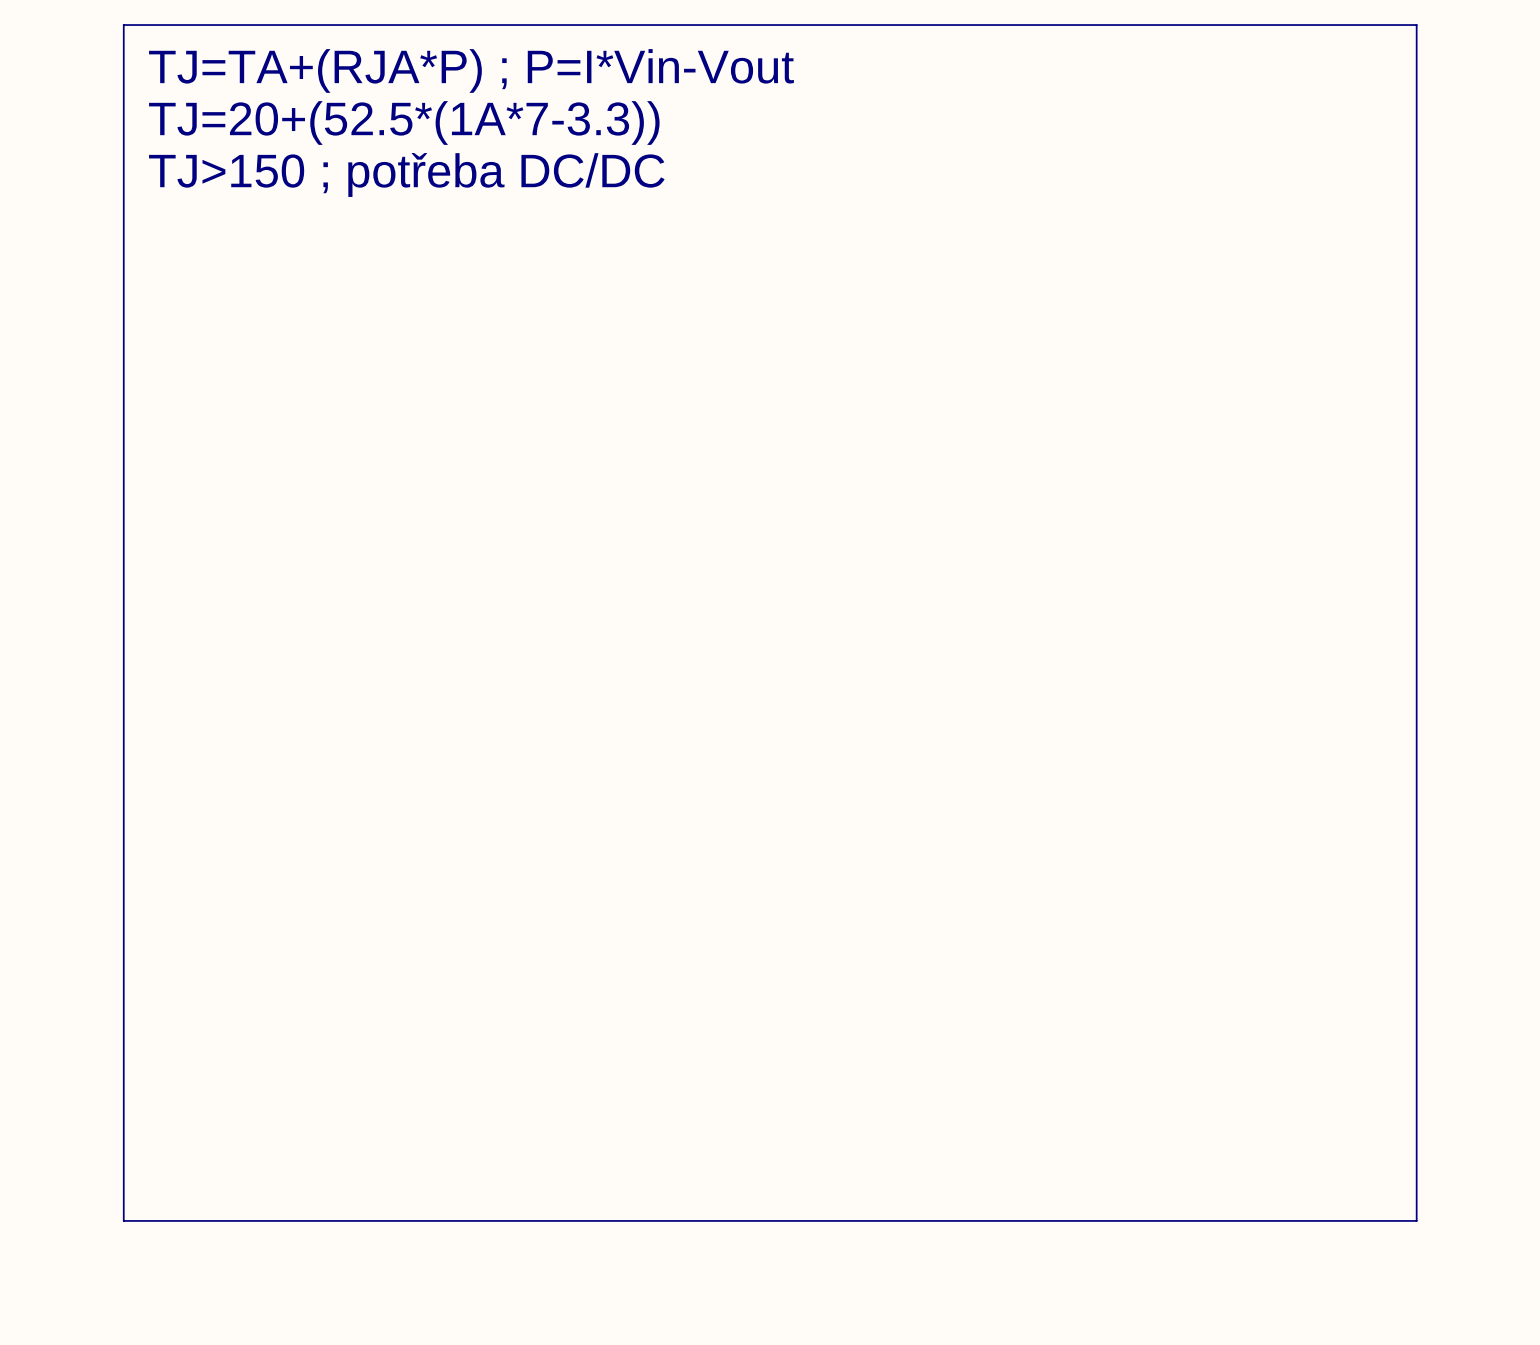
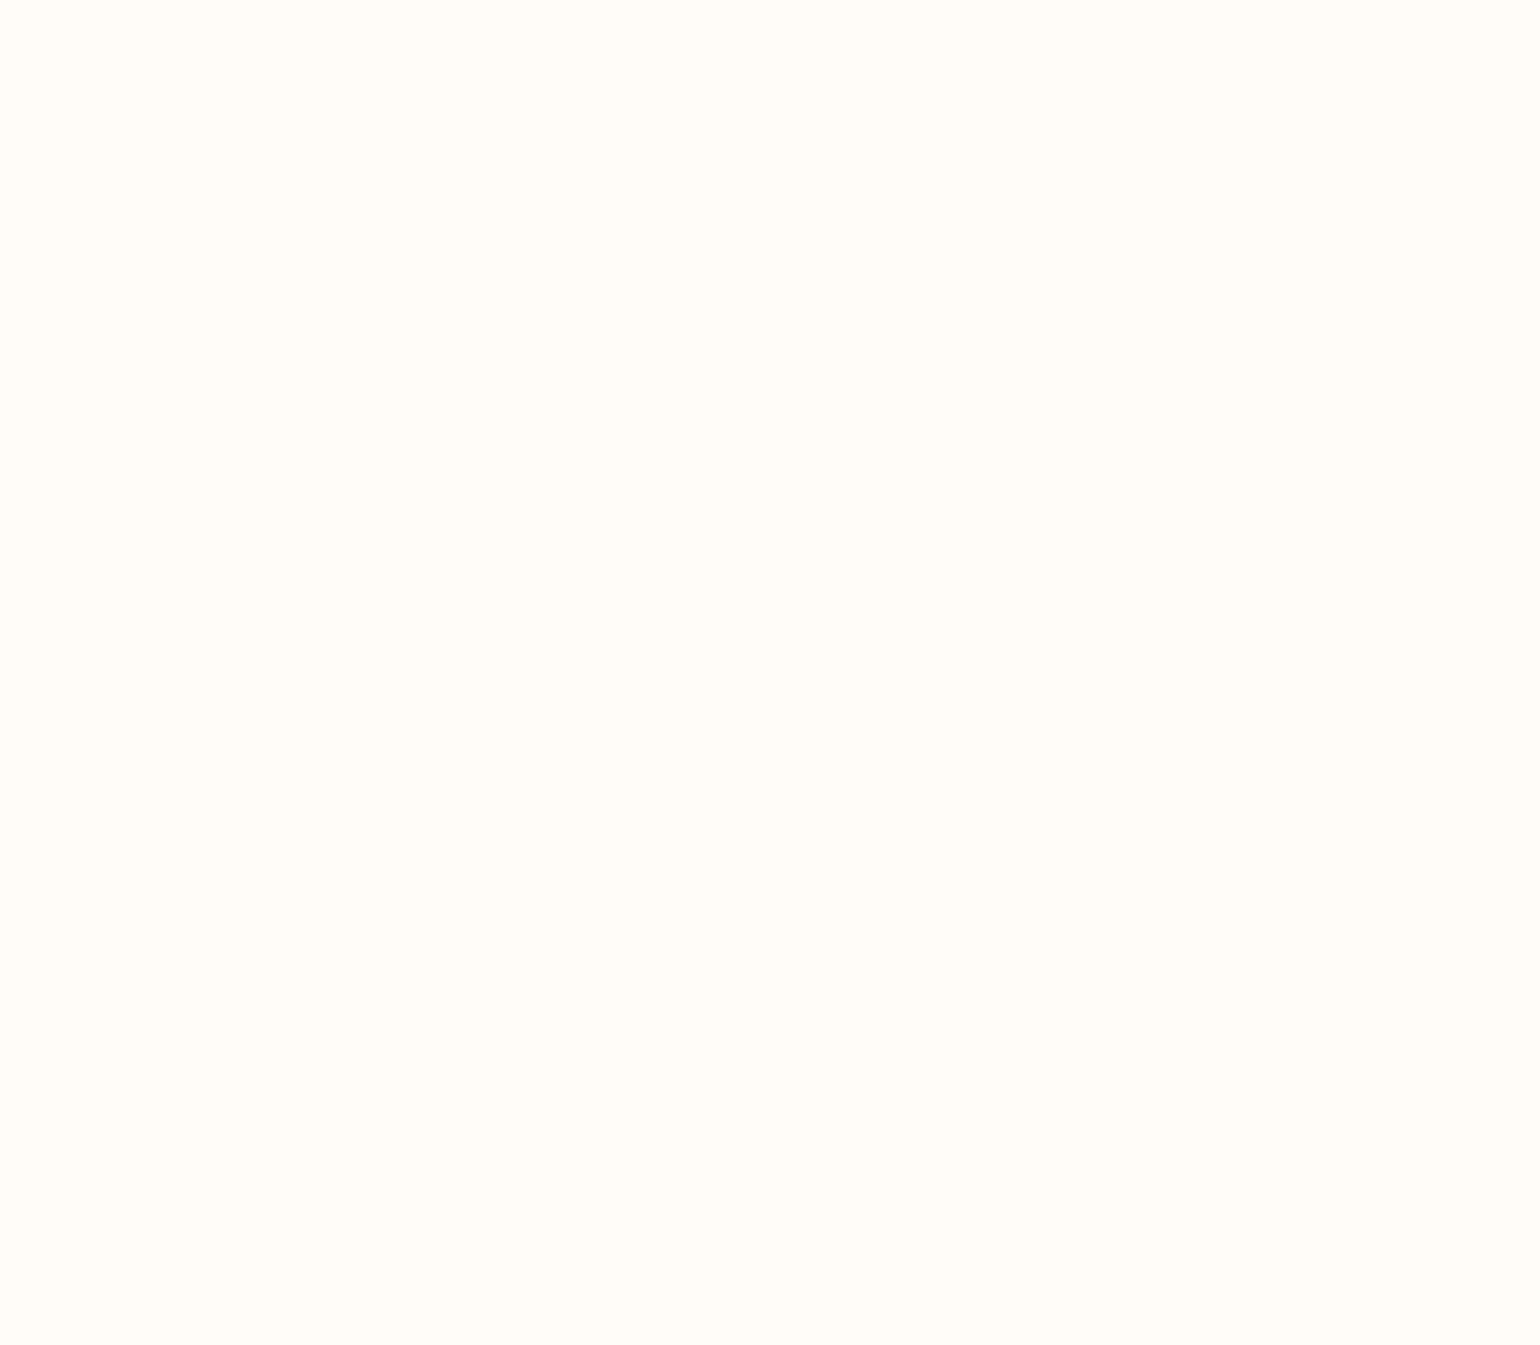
line: (123, 25) (1416, 25) (1416, 1220) (123, 1220) (123, 25) -> none
text: TJ=TA+(RJA*P) ; P=I*Vin-Vout (471, 70) -> none
text: TJ=20+(52.5*(1A*7-3.3)) (404, 123) -> none
text: TJ>150 ; potřeba DC/DC (406, 174) -> none

